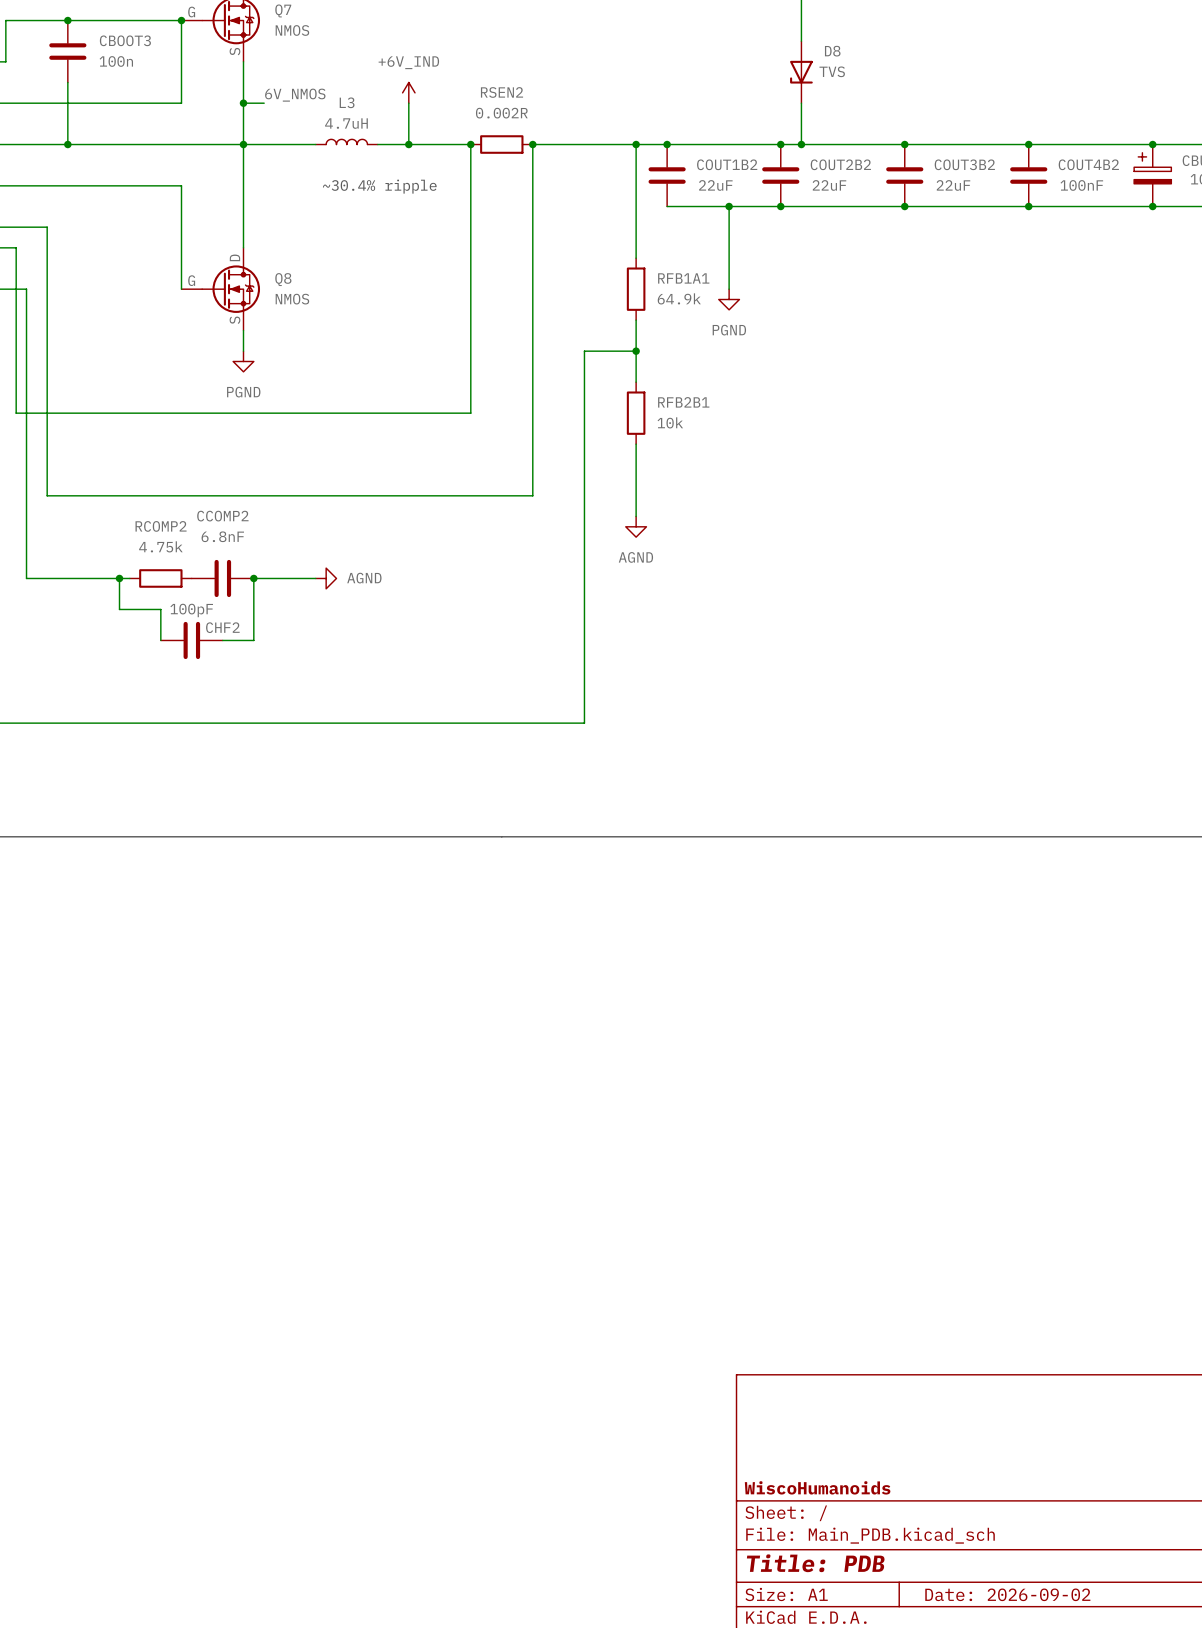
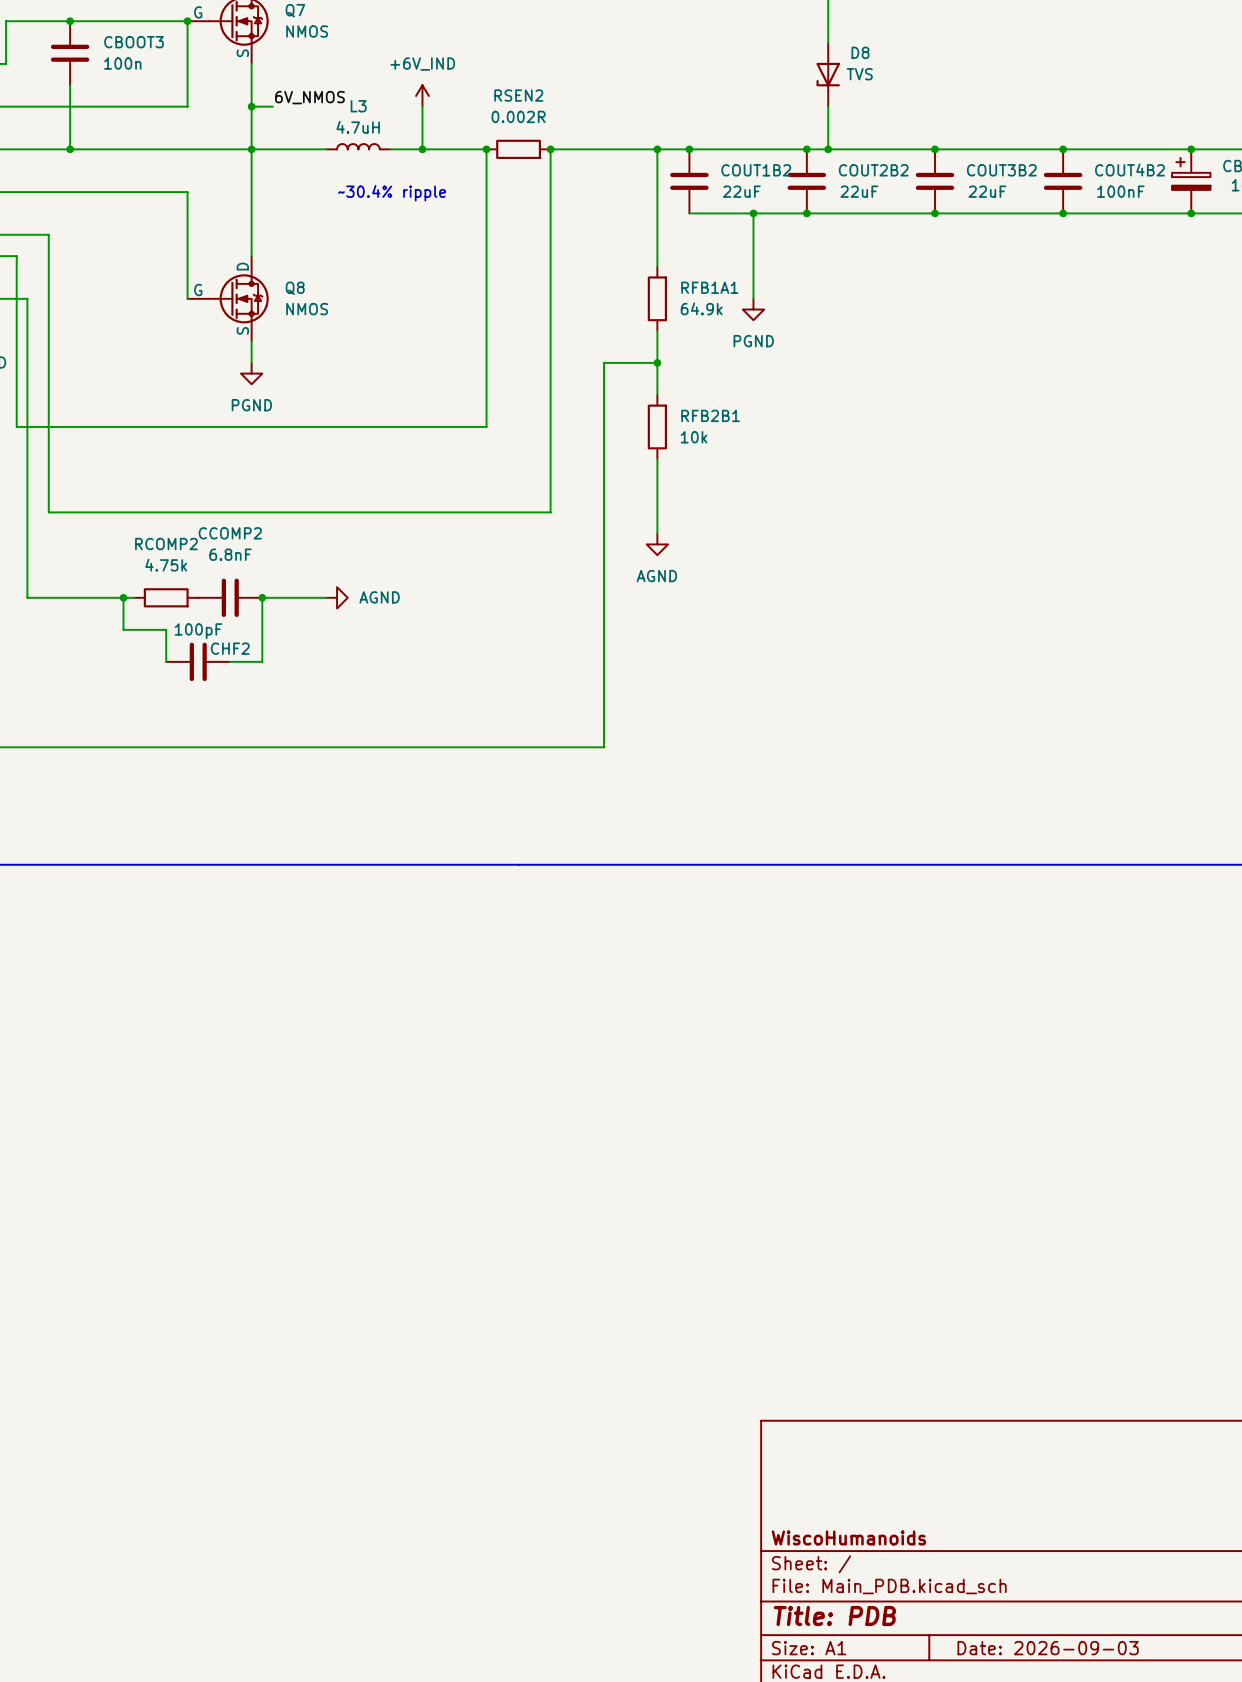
title block: Date: 2026-09-02 (1007, 1594) -> Date: 2026-09-03 (1048, 1648)

